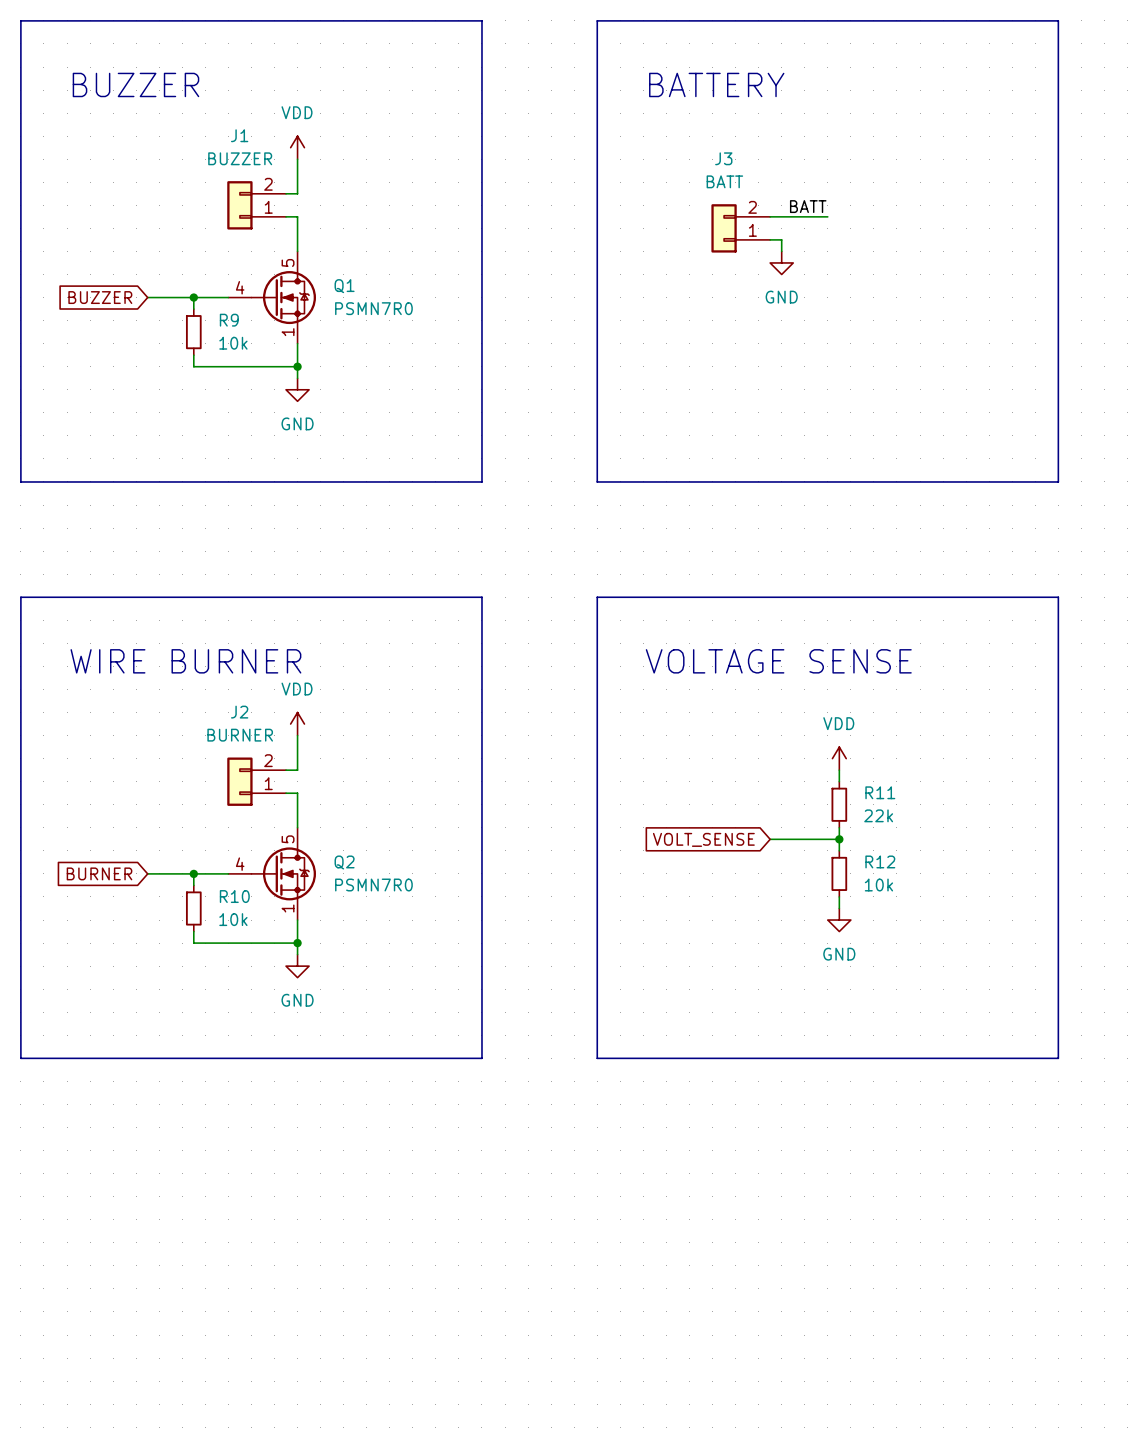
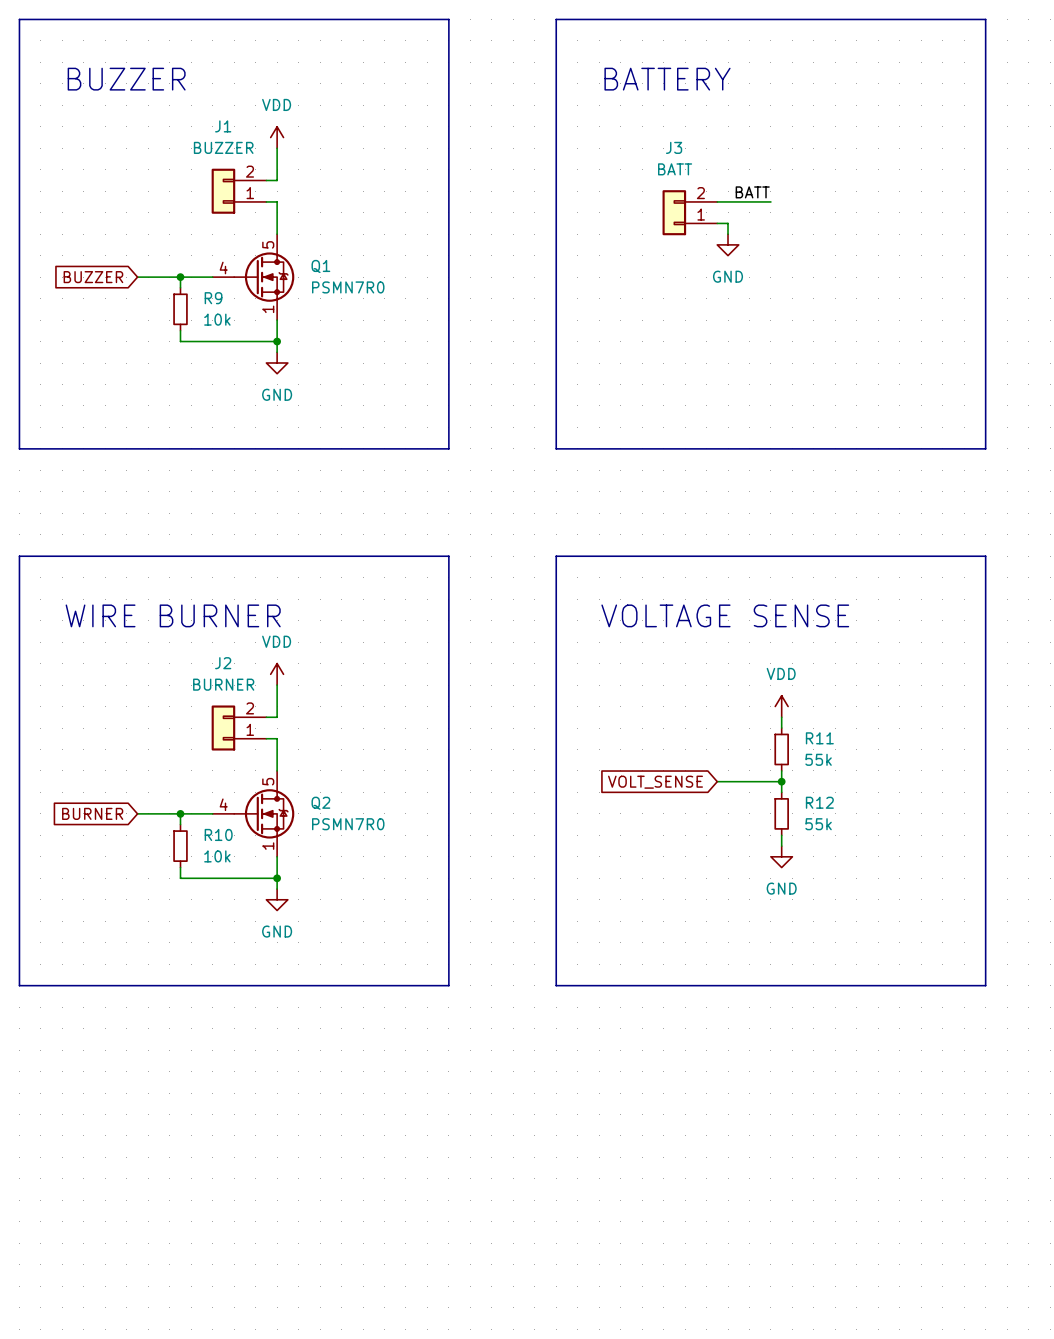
R11 value: 22k (878, 815) -> 55k (818, 759)
R12 value: 10k (878, 885) -> 55k (818, 824)

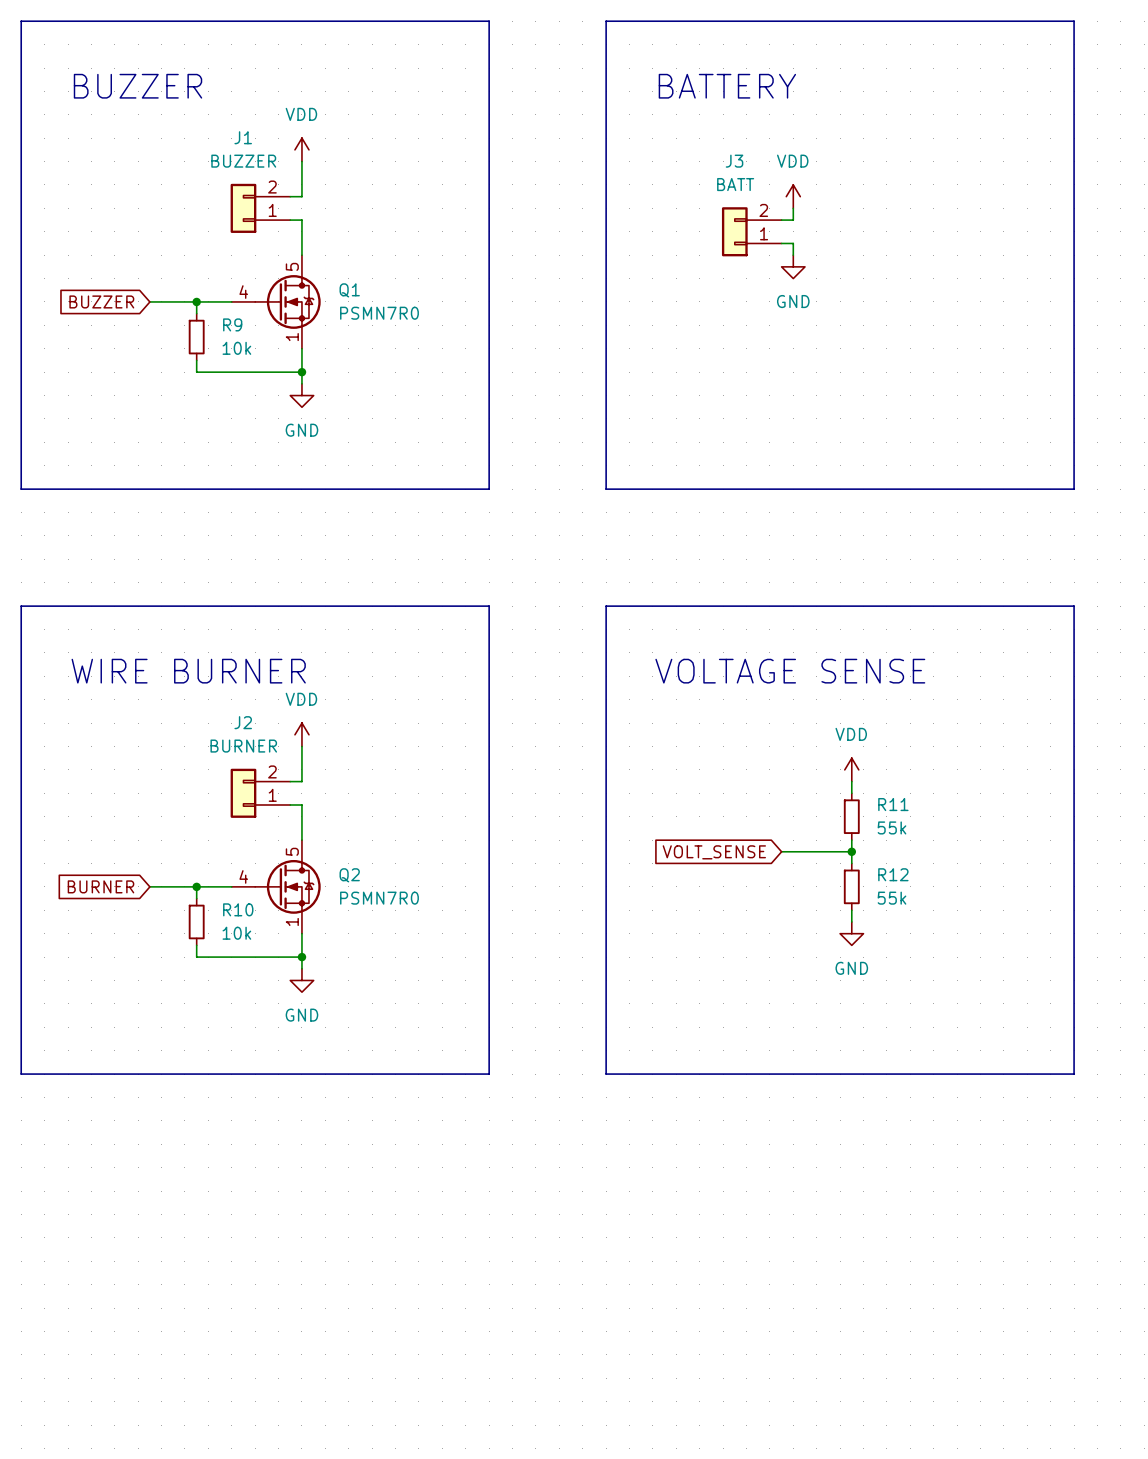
power symbol: none -> VDD (793, 196)
label: BATT (752, 192) -> none
wire: (728, 201) (770, 201) -> (793, 220) (793, 208)

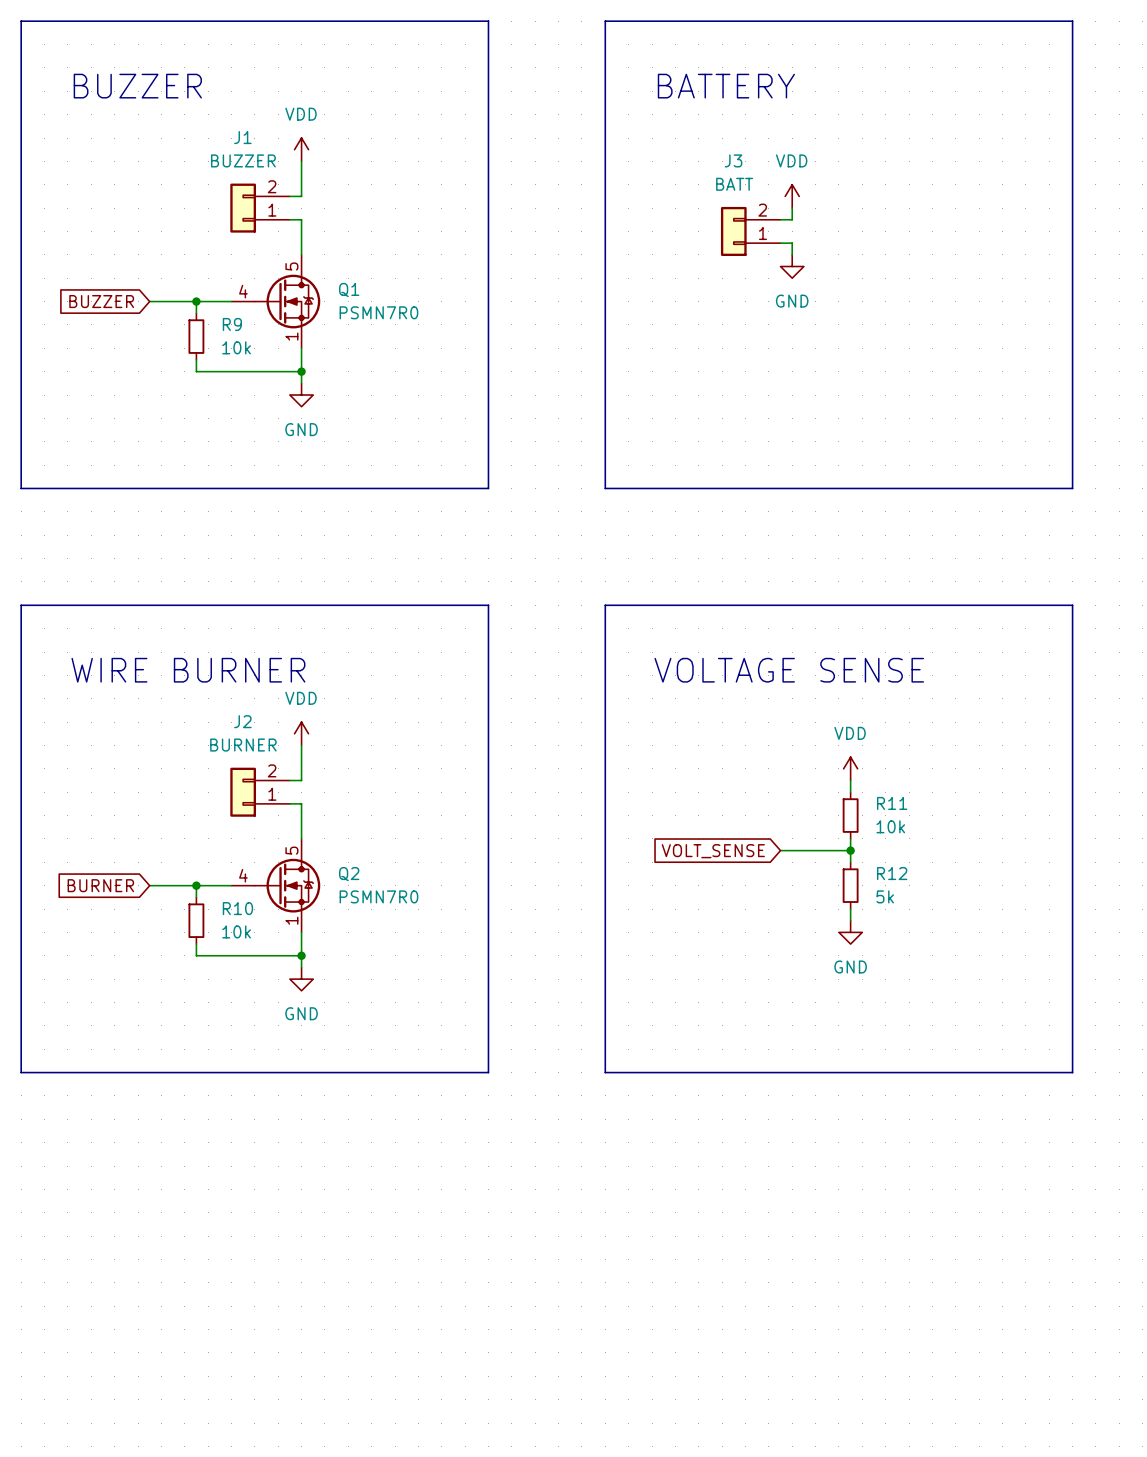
R11 value: 55k (891, 827) -> 10k (890, 826)
R12 value: 55k (891, 898) -> 5k (885, 896)

